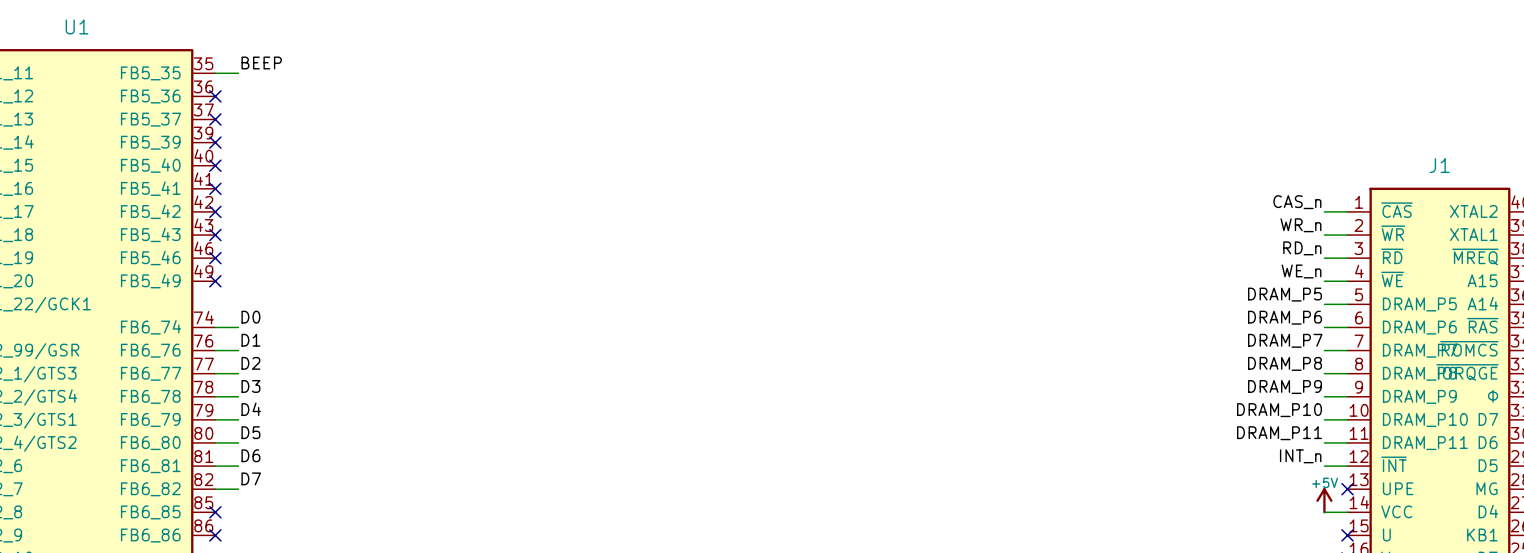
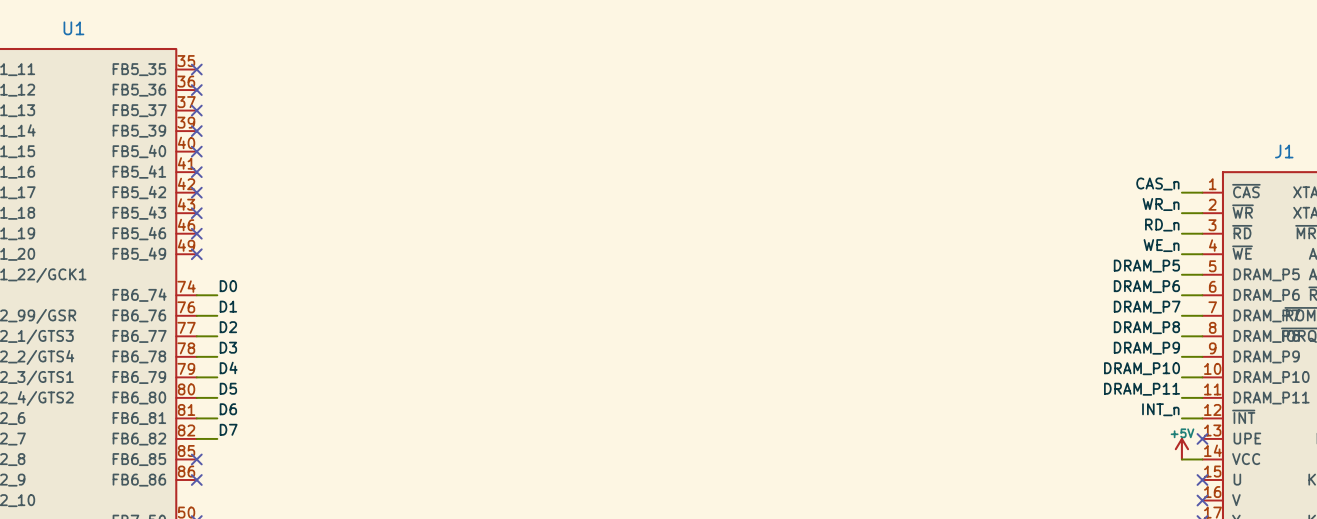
label: BEEP (261, 62) -> none
wire: (215, 73) (238, 73) -> none
no-connect mark: none -> (196, 69)

